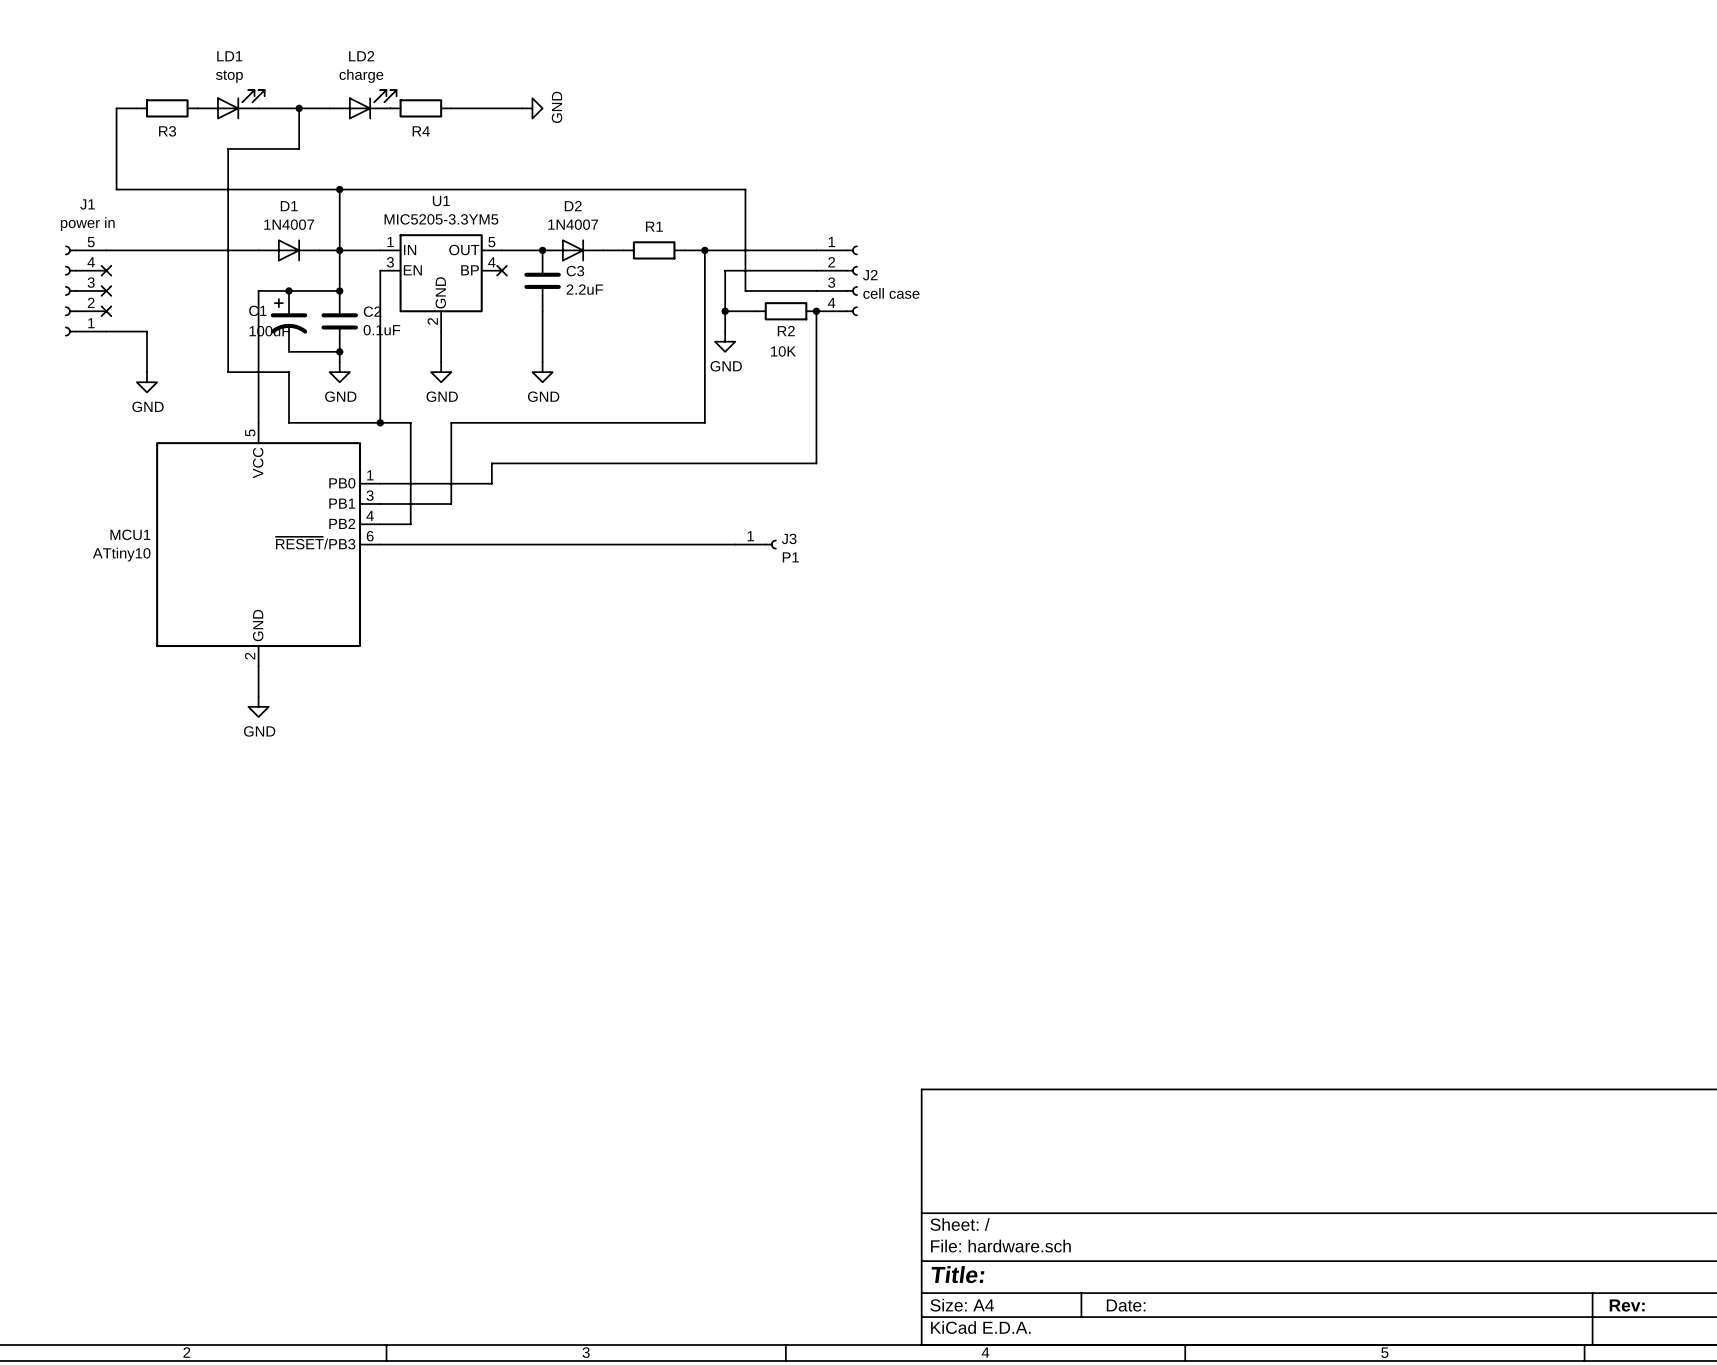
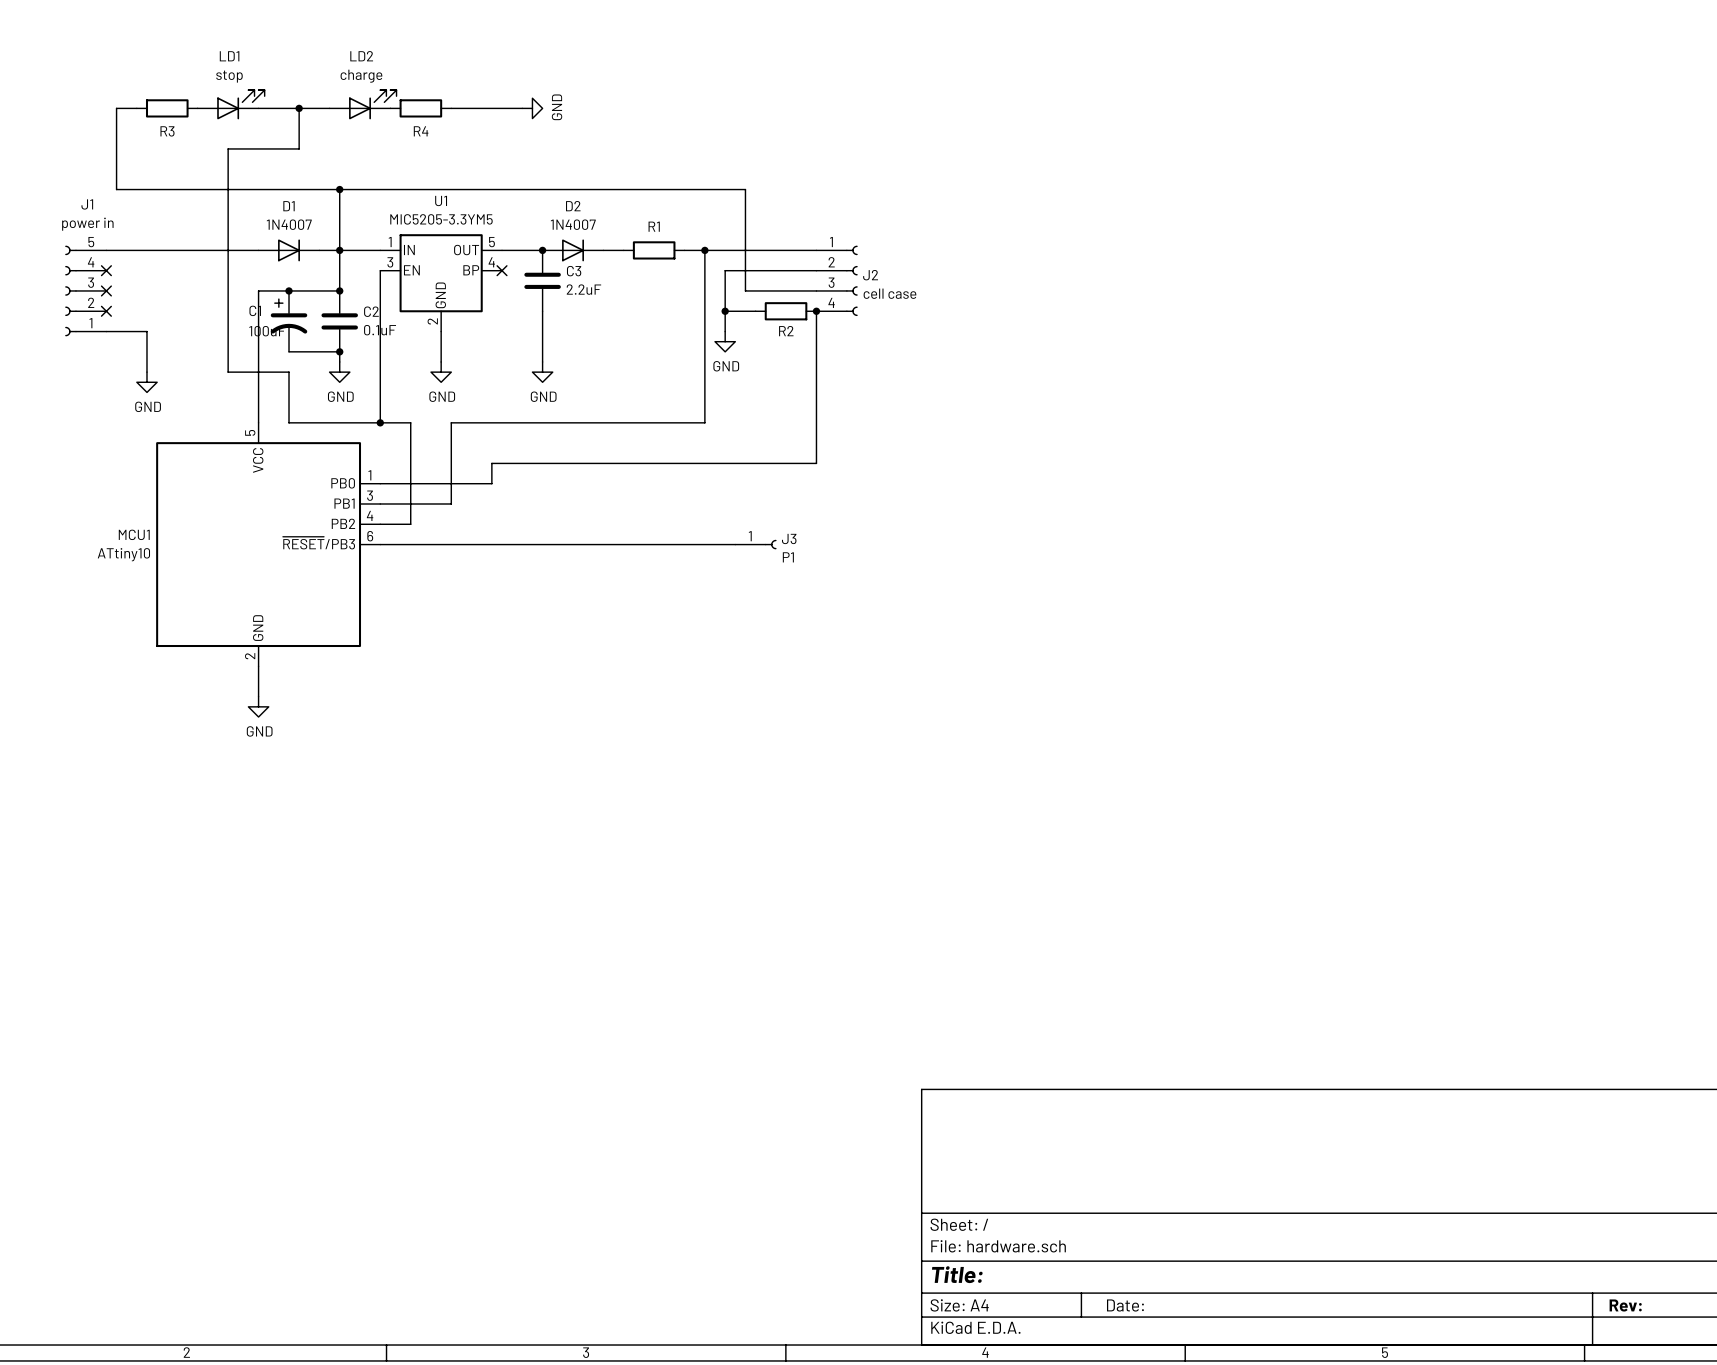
R2 value: 10K (783, 351) -> none

